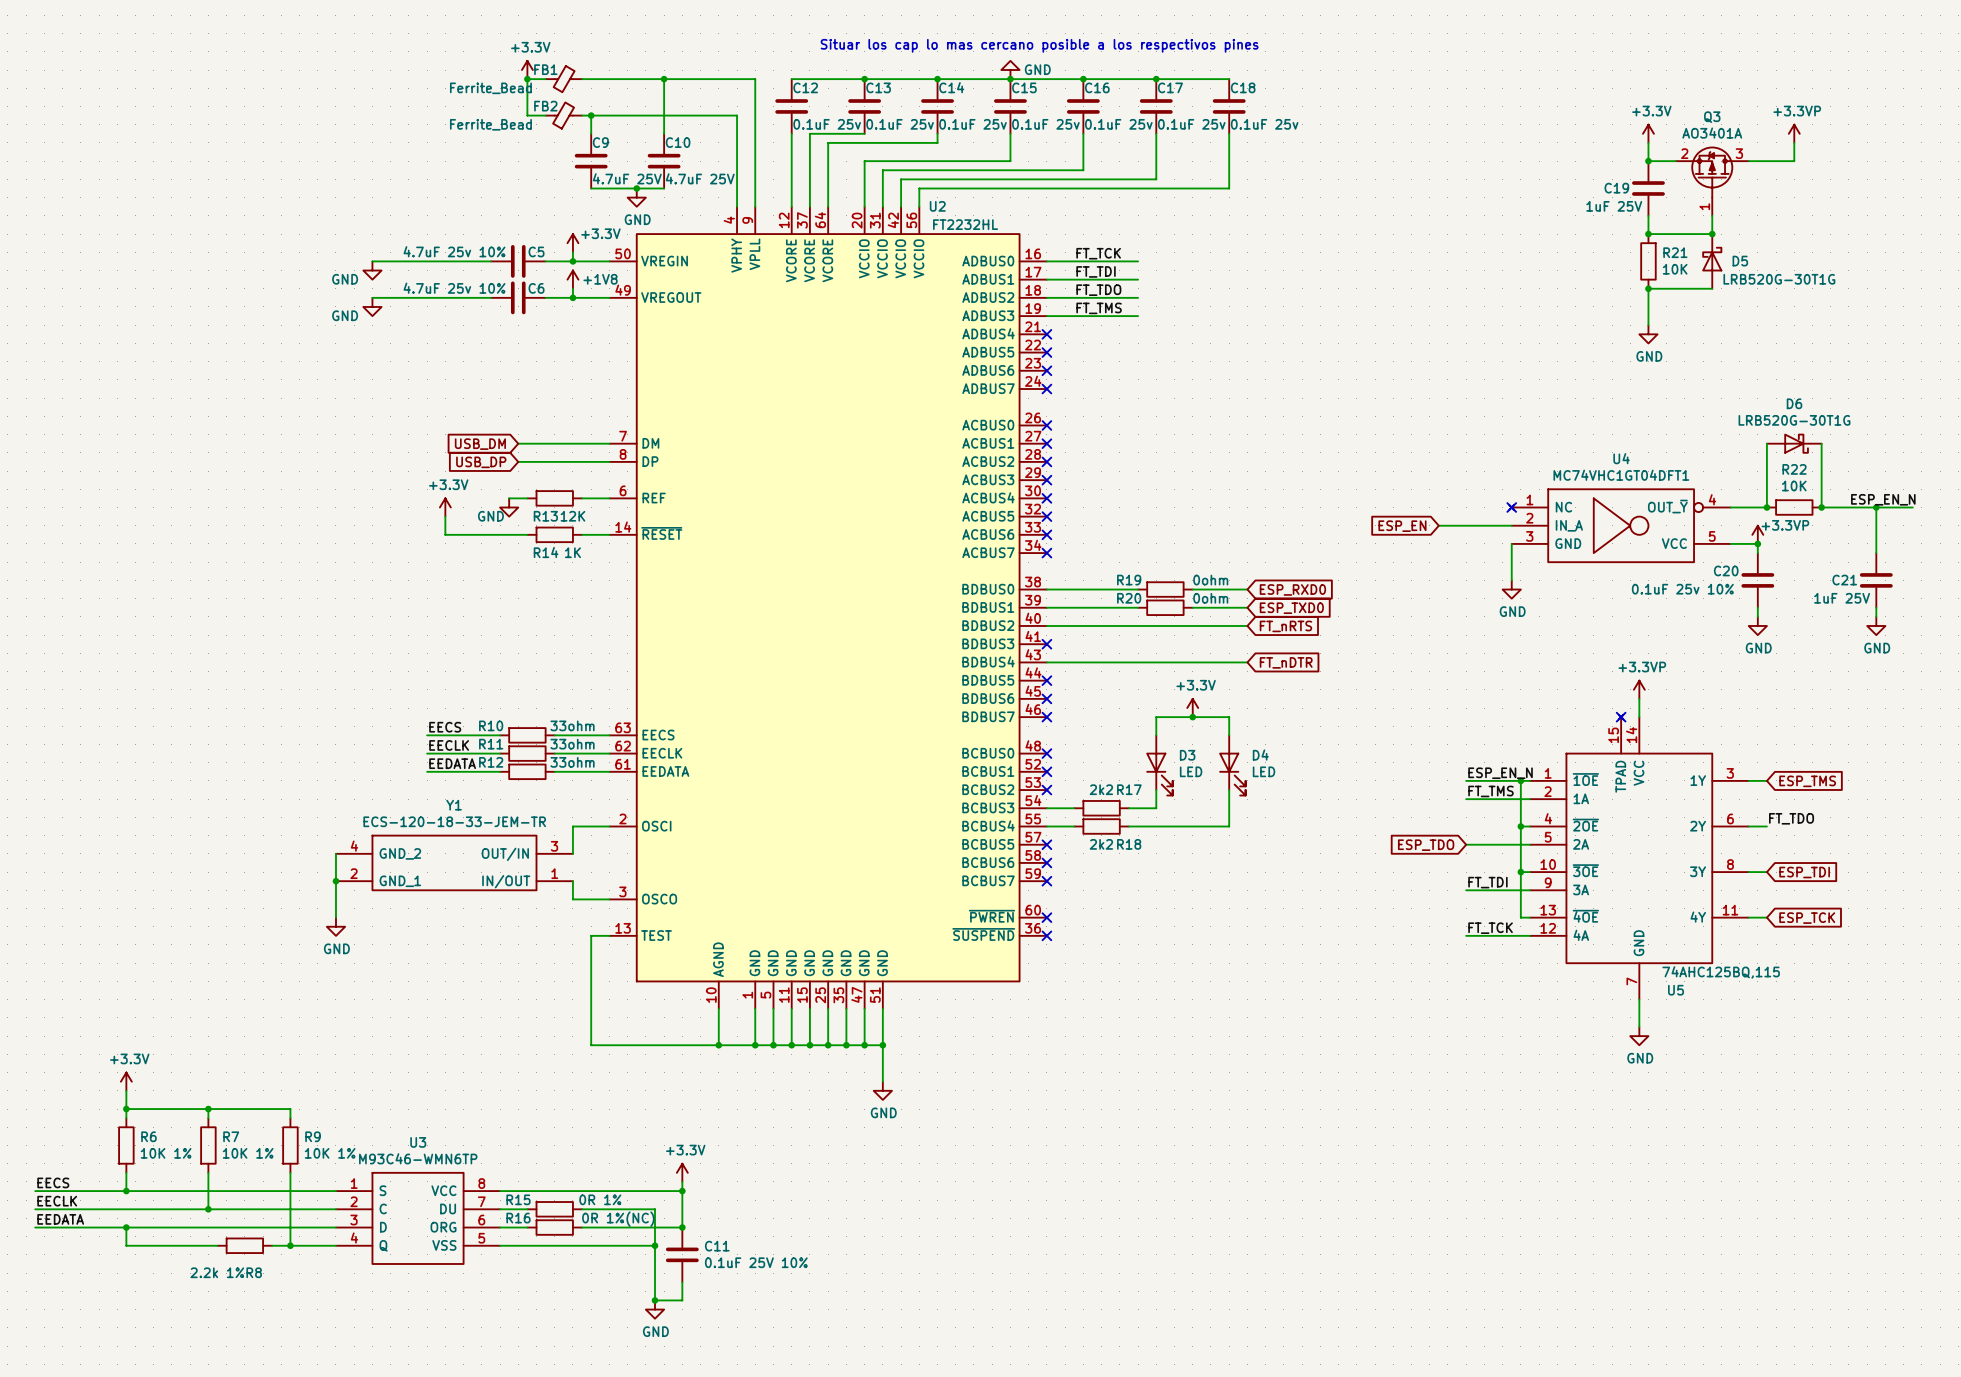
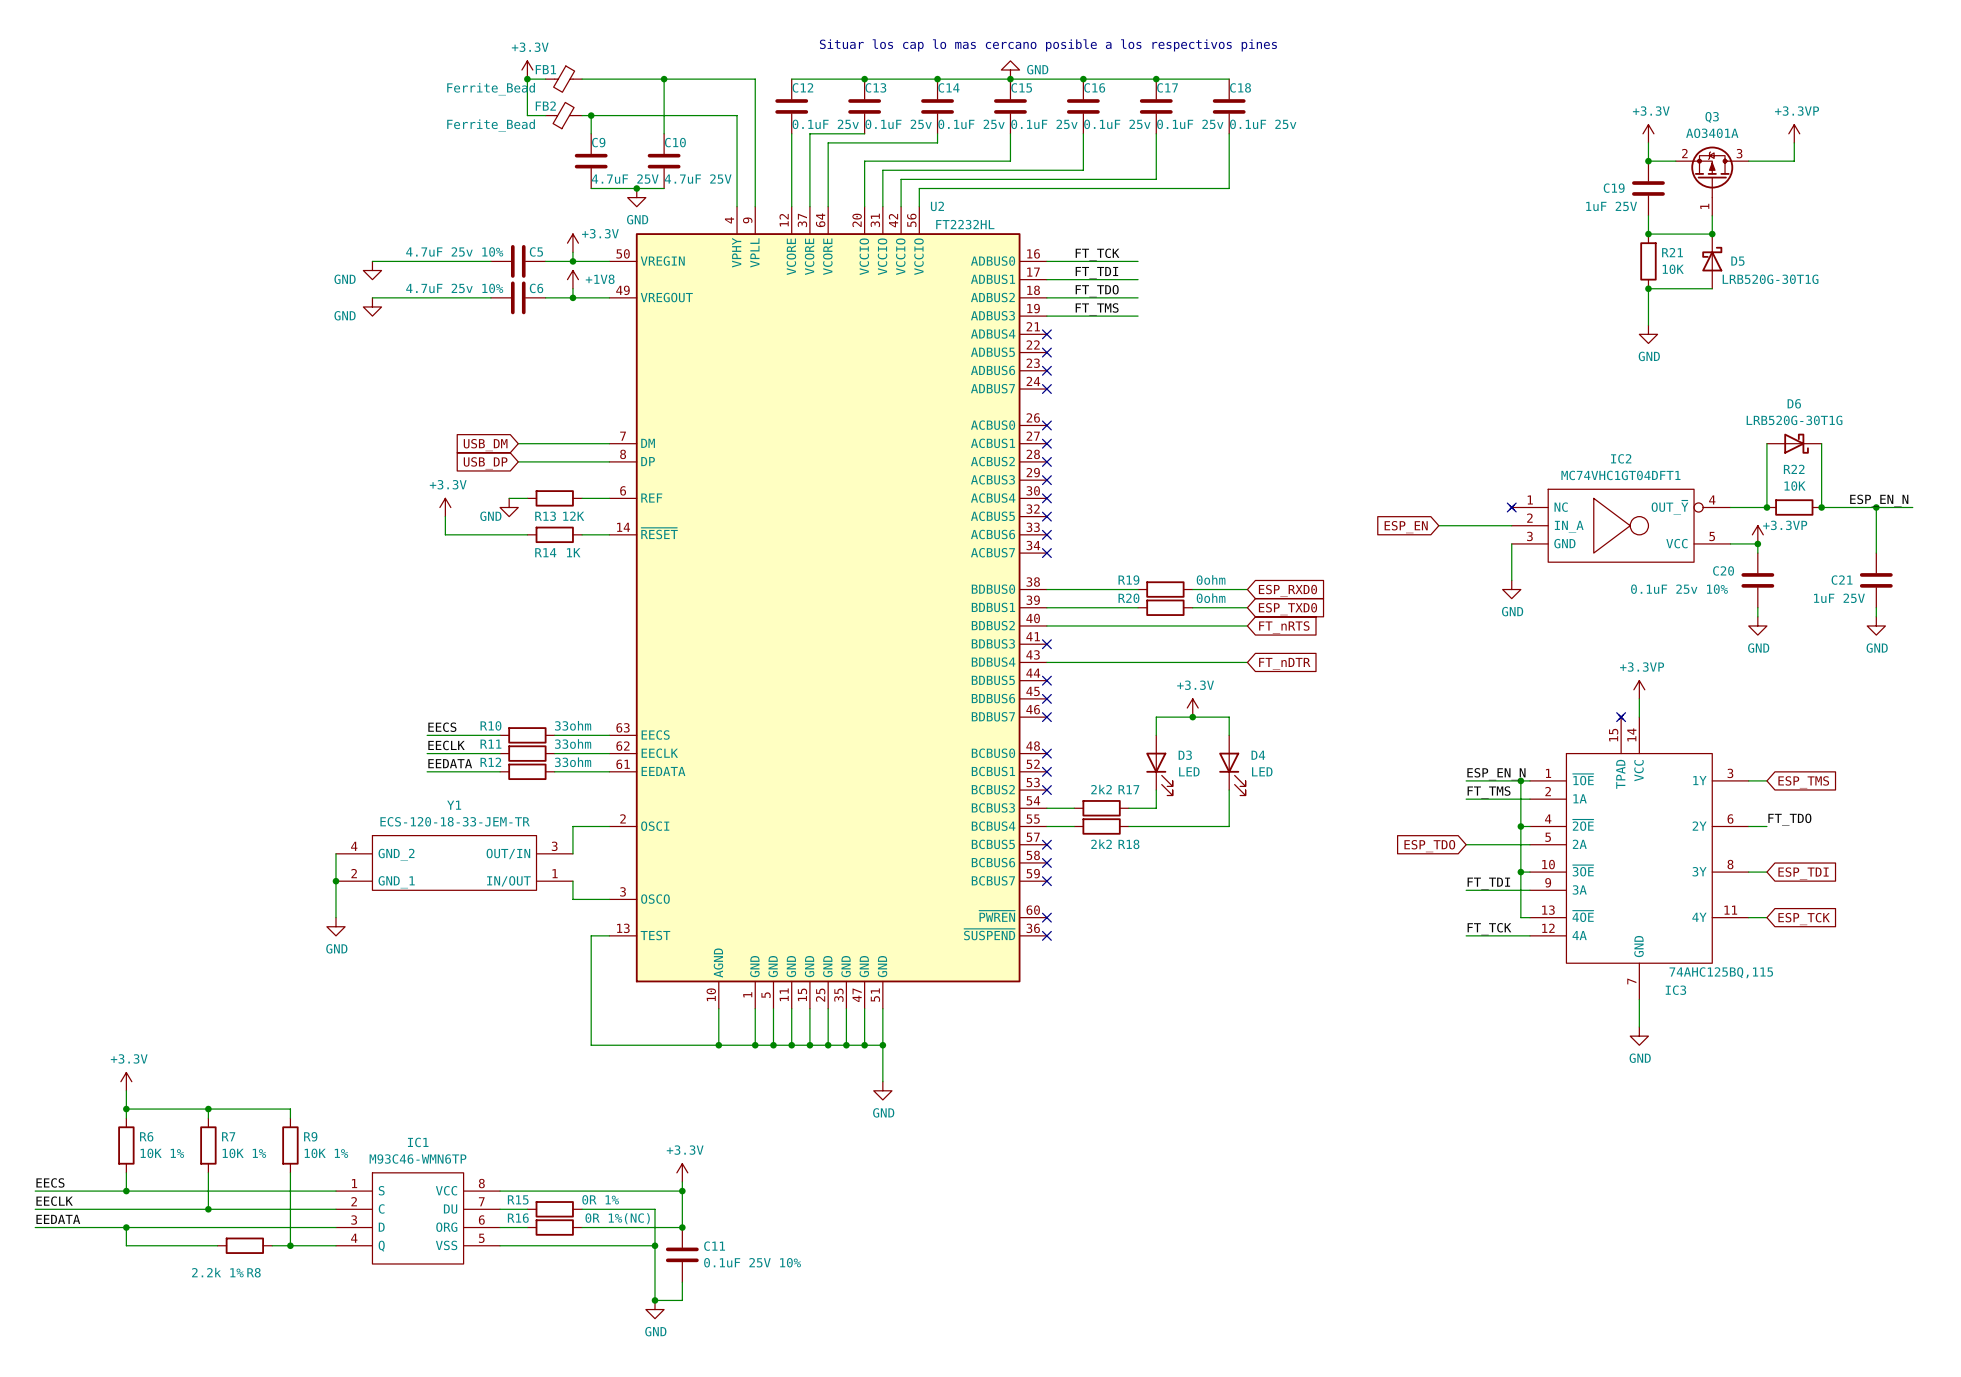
U4 name: U4 (1621, 458) -> IC2 (1621, 458)
U5 name: U5 (1676, 990) -> IC3 (1675, 990)
U3 name: U3 (418, 1142) -> IC1 (418, 1142)

